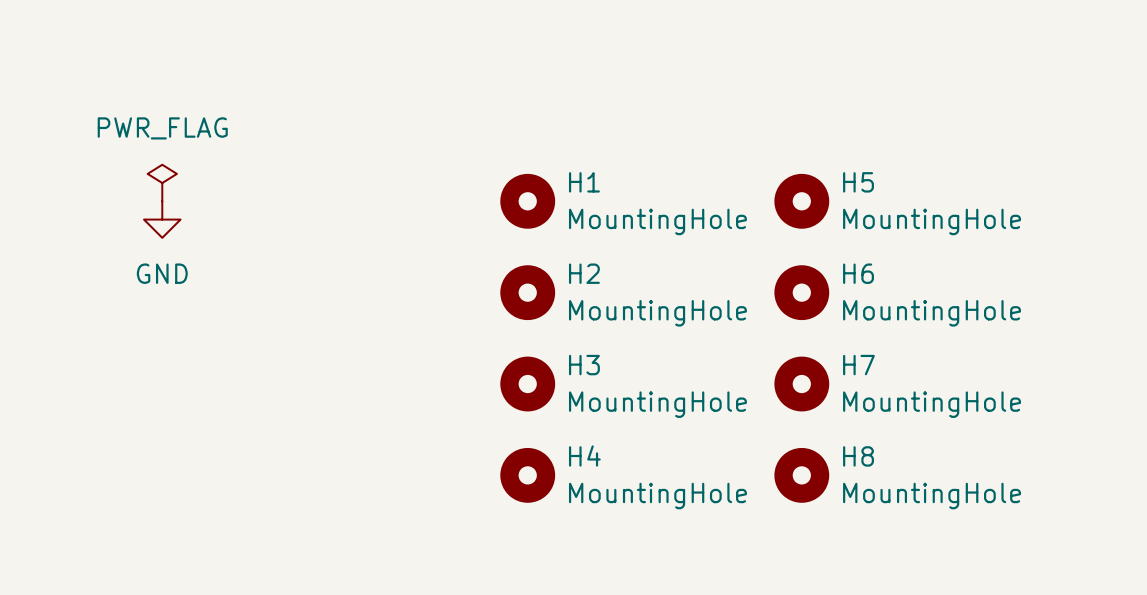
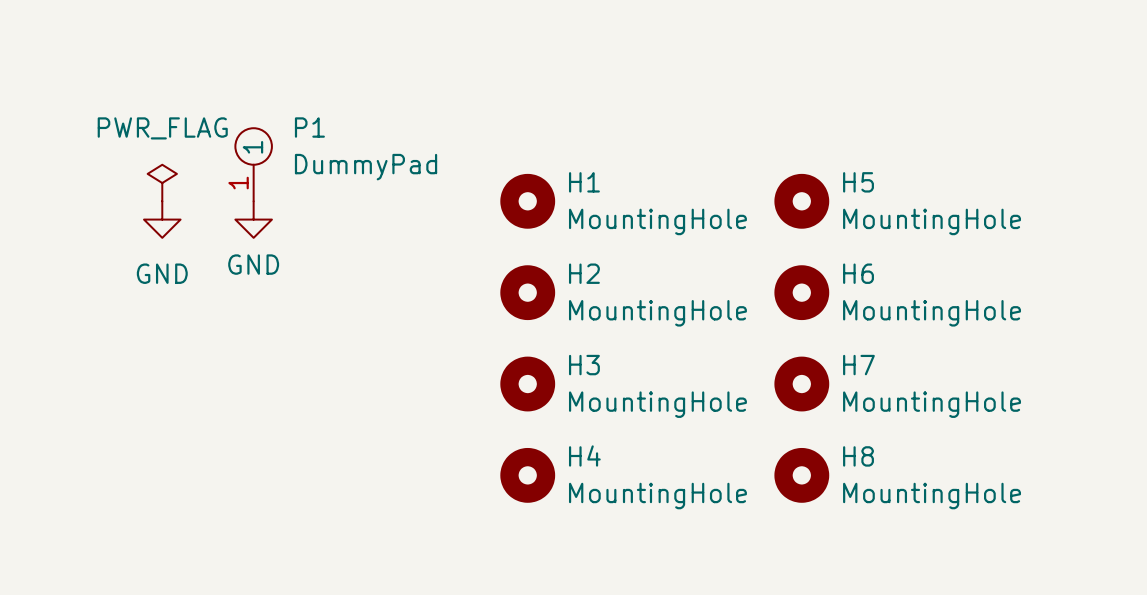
P1: none -> DummyPad (253, 164)
power symbol: none -> GND (253, 219)

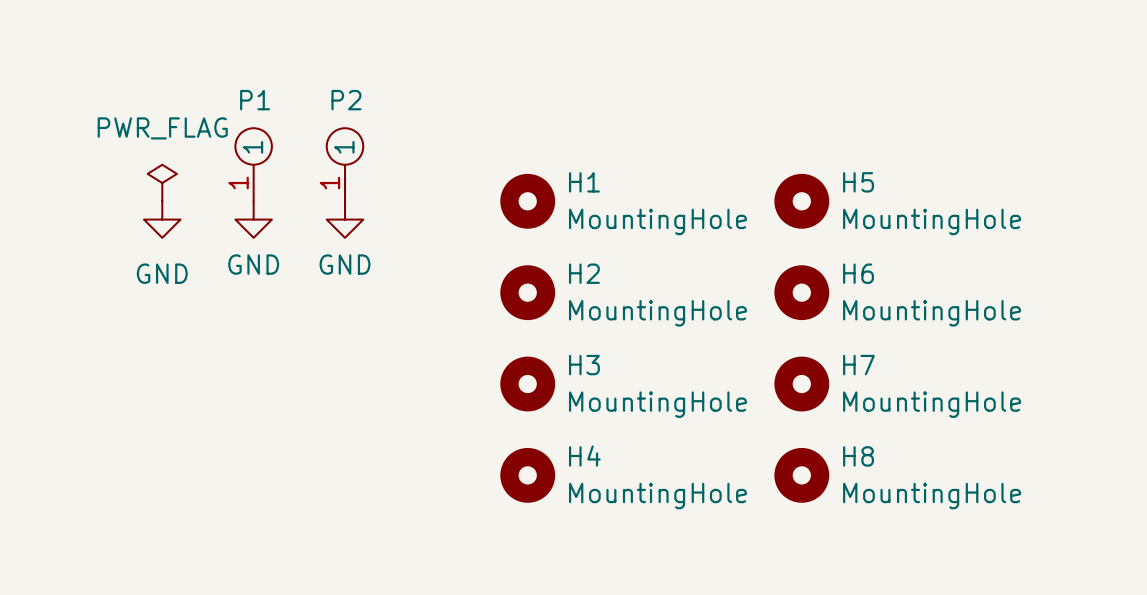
P1 name position: P1 (309, 127) -> P1 (255, 100)
P2: none -> (345, 164)
P1 value: DummyPad (366, 167) -> none
power symbol: none -> GND (345, 219)

